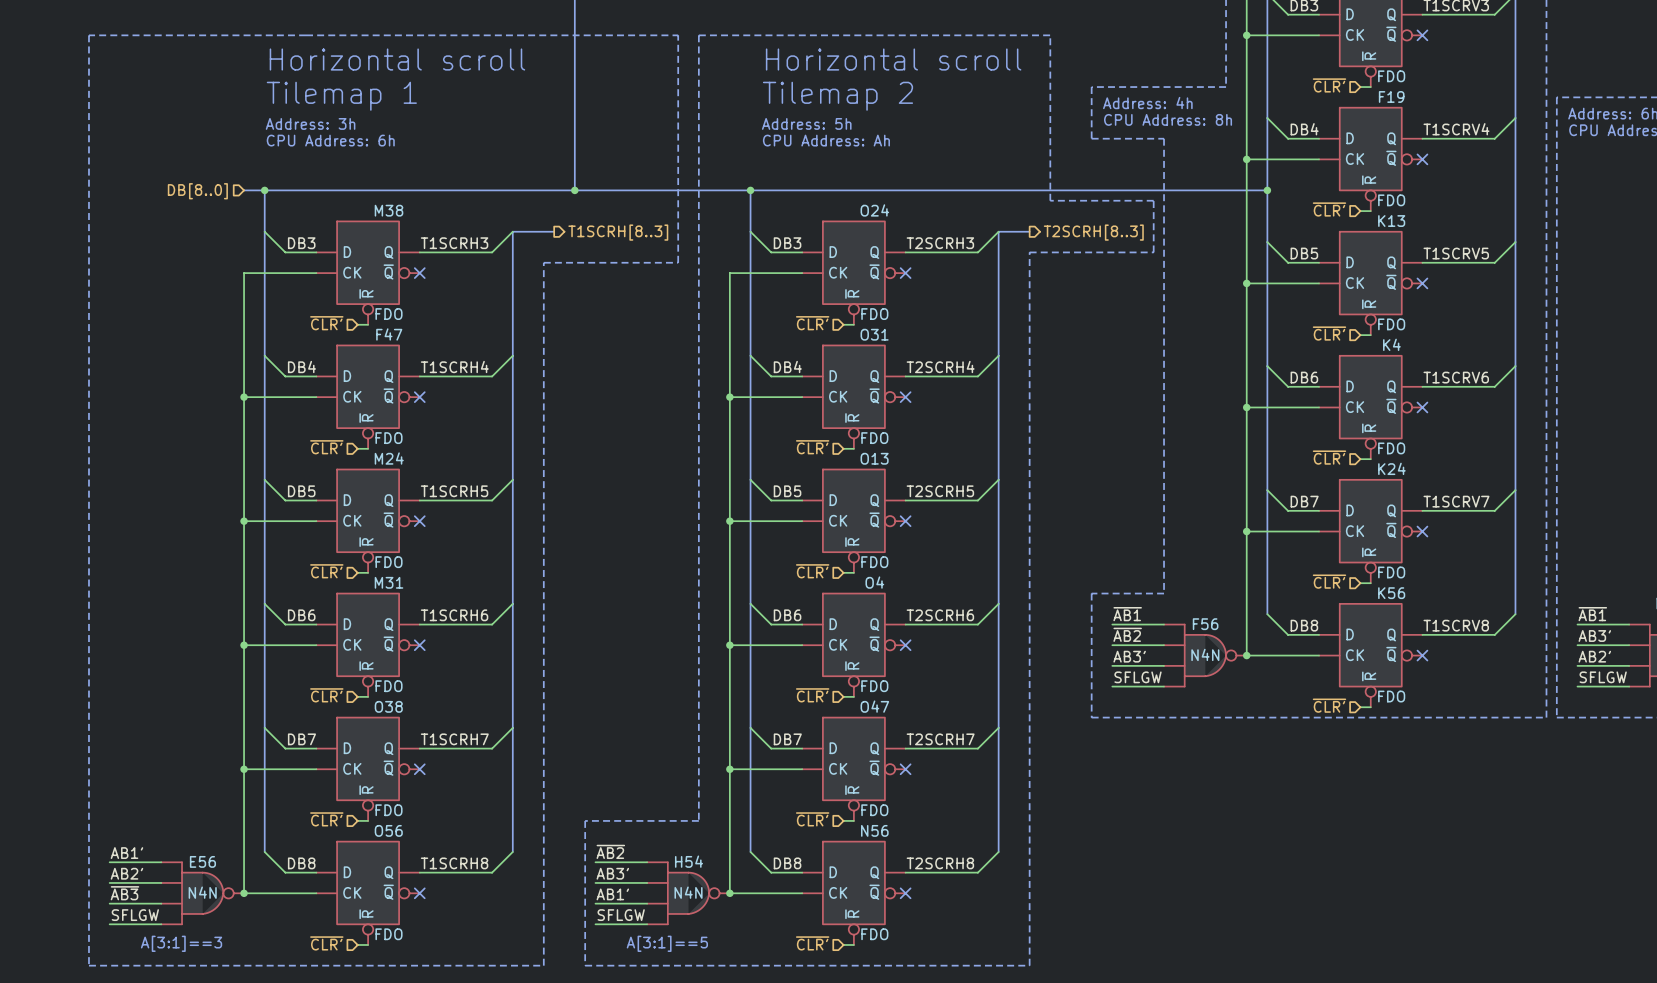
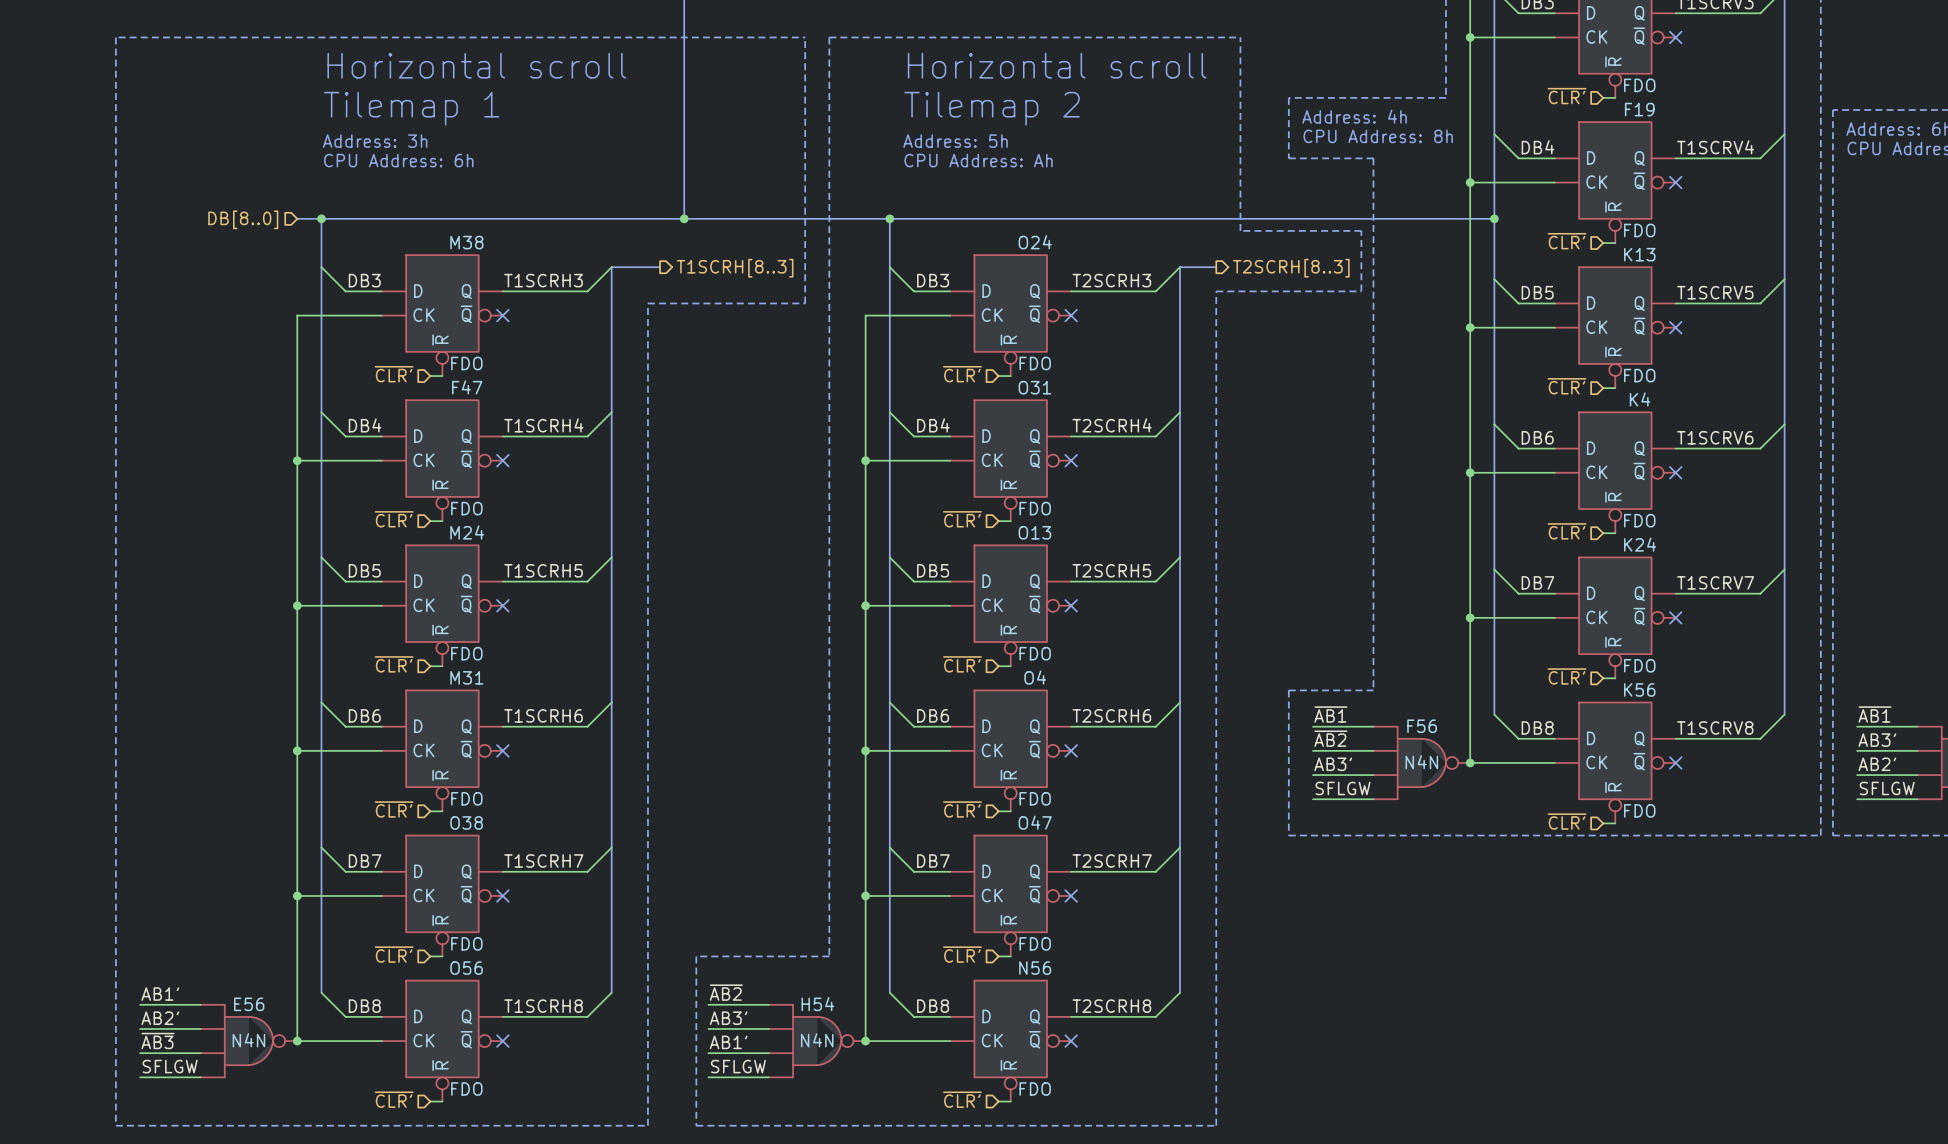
text: A[3:1]==3 (181, 943) -> none
text: A[3:1]==5 (667, 943) -> none

